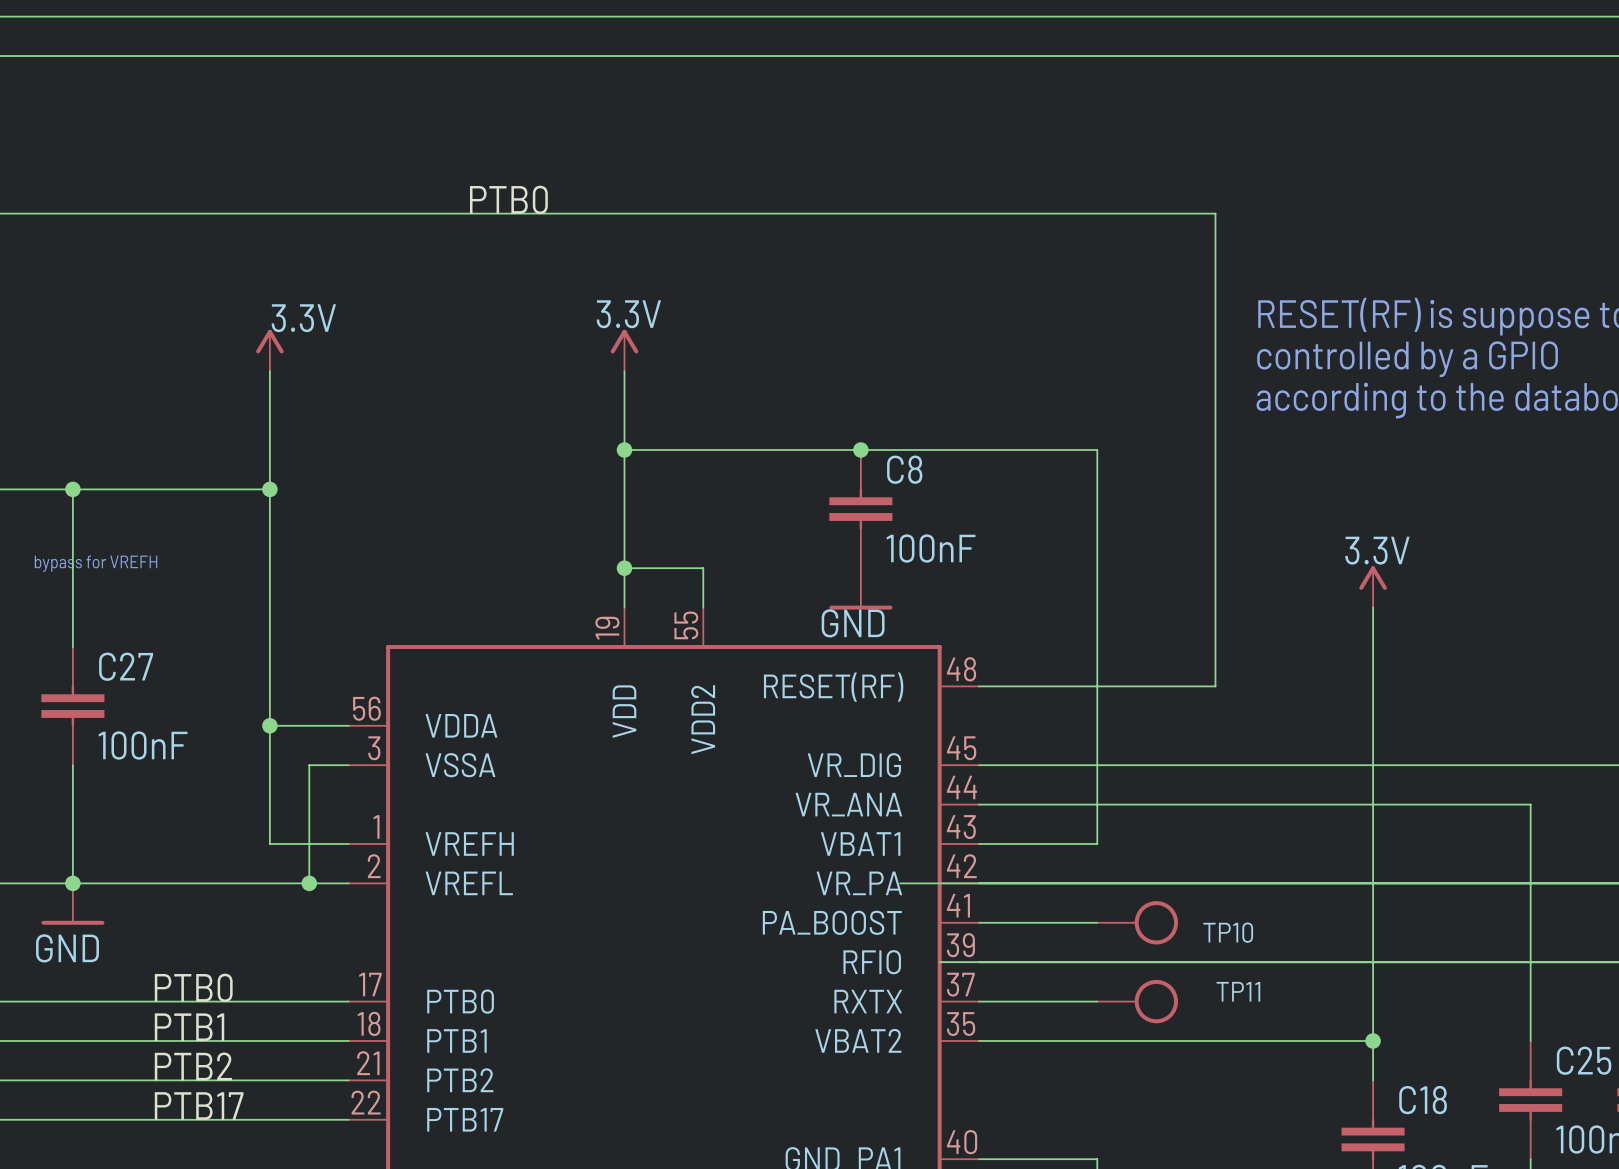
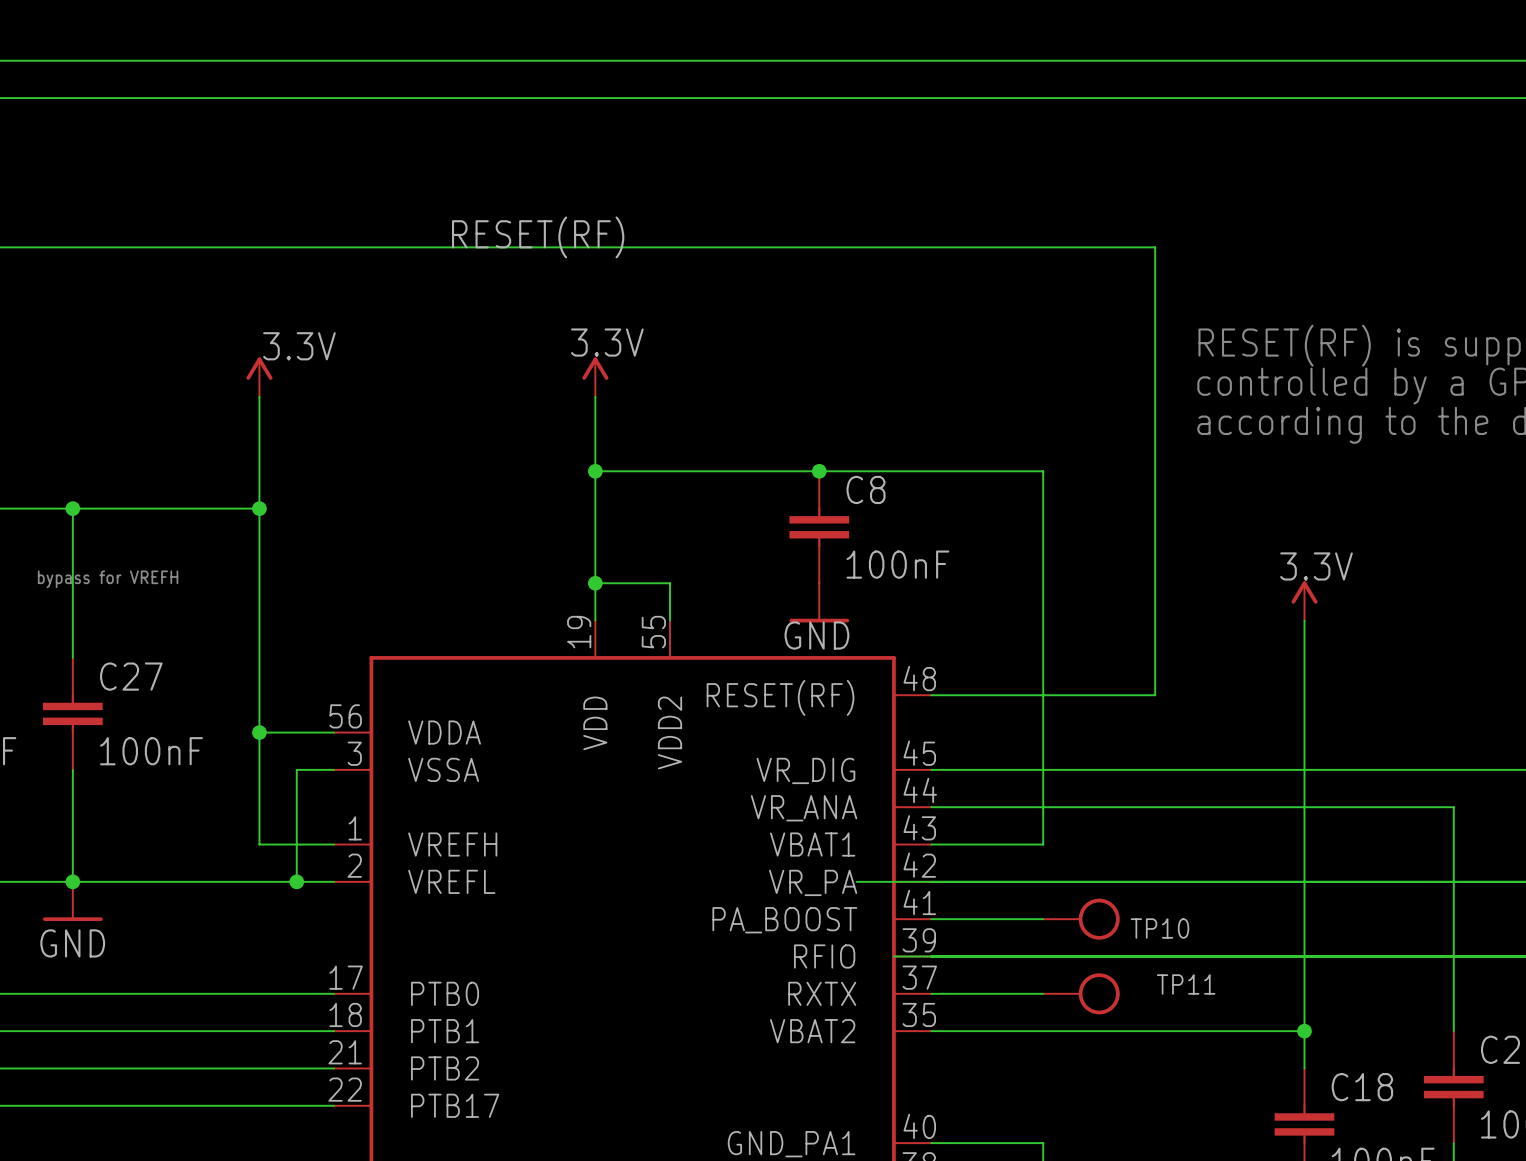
label: PTB0 (508, 199) -> RESET(RF) (538, 237)
label: PTB0 (193, 987) -> none
label: PTB1 (189, 1027) -> none
label: PTB2 (193, 1066) -> none
label: PTB17 (199, 1105) -> none

